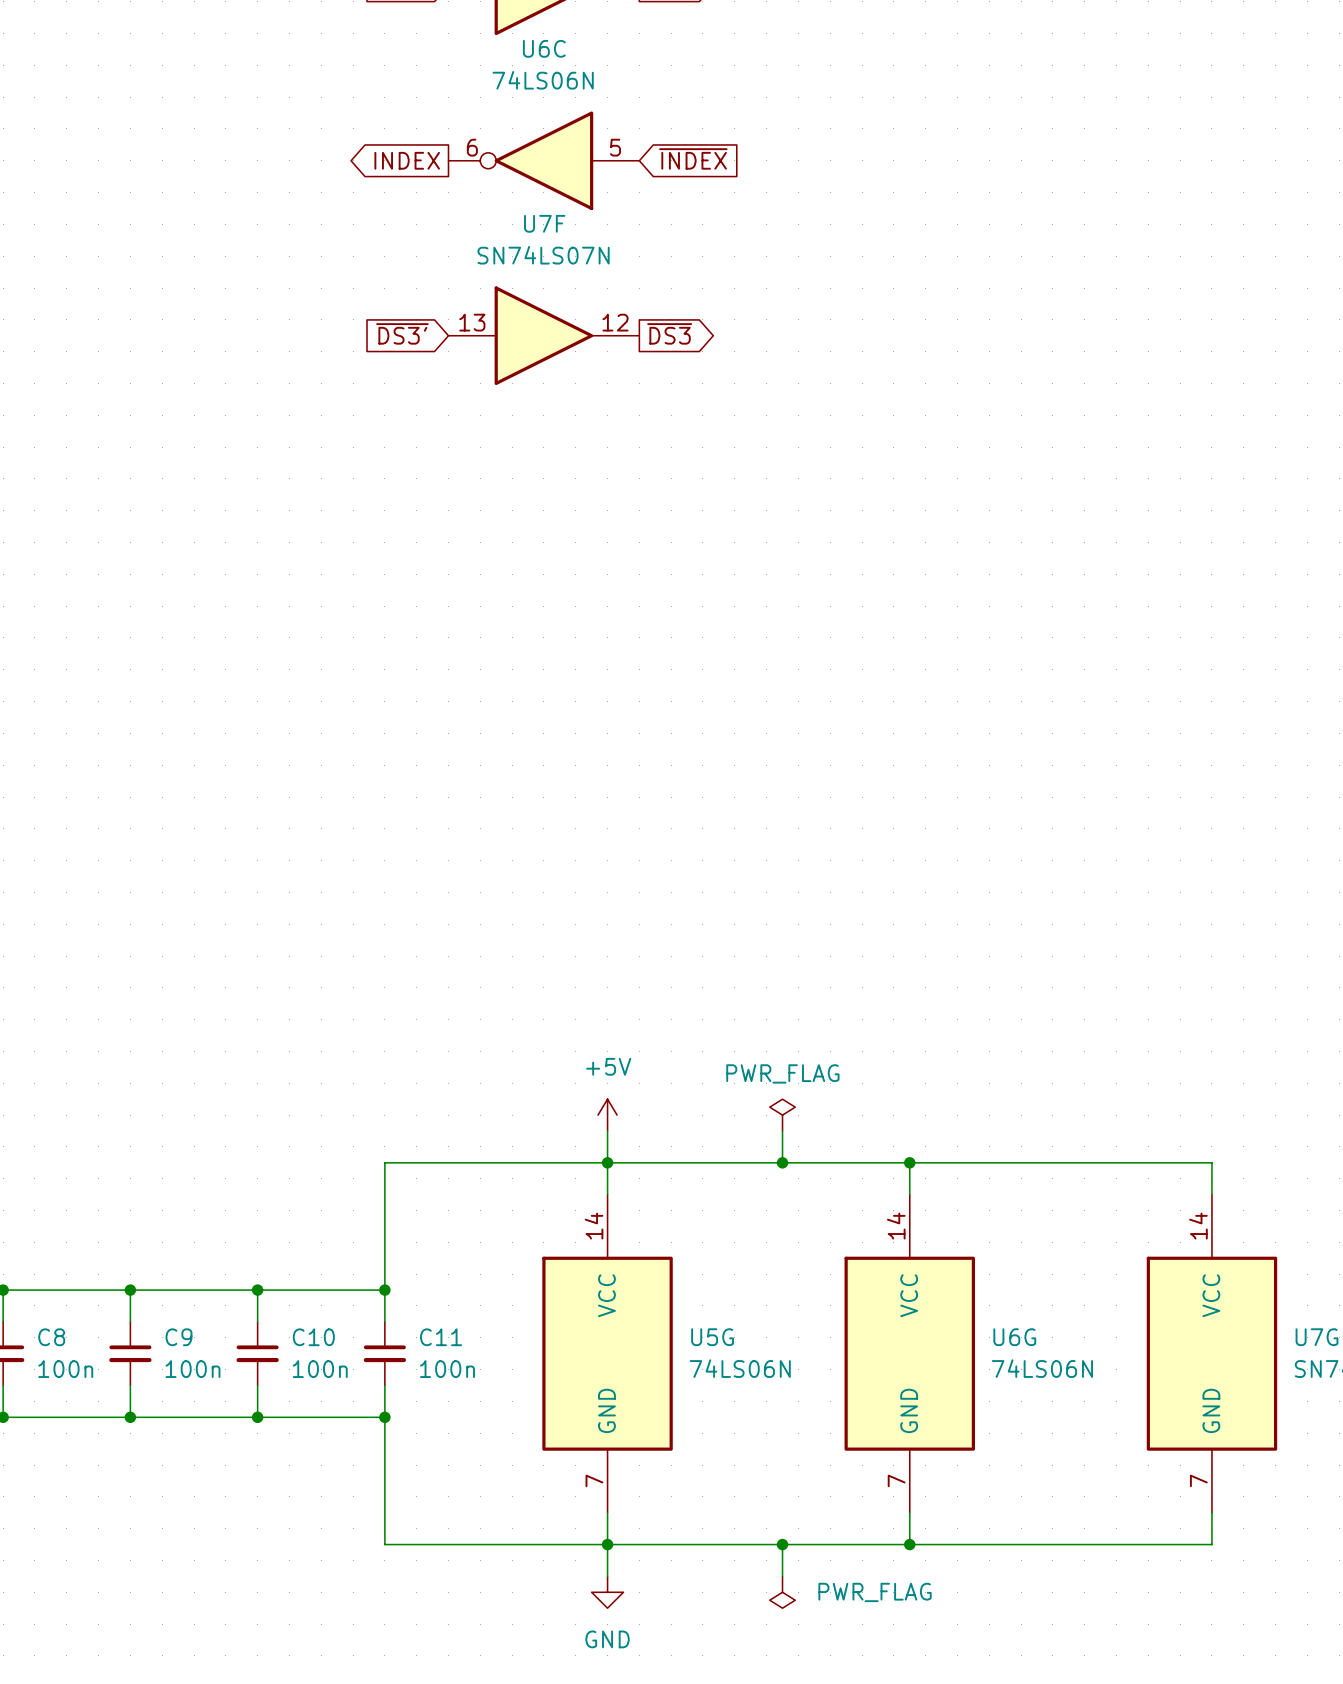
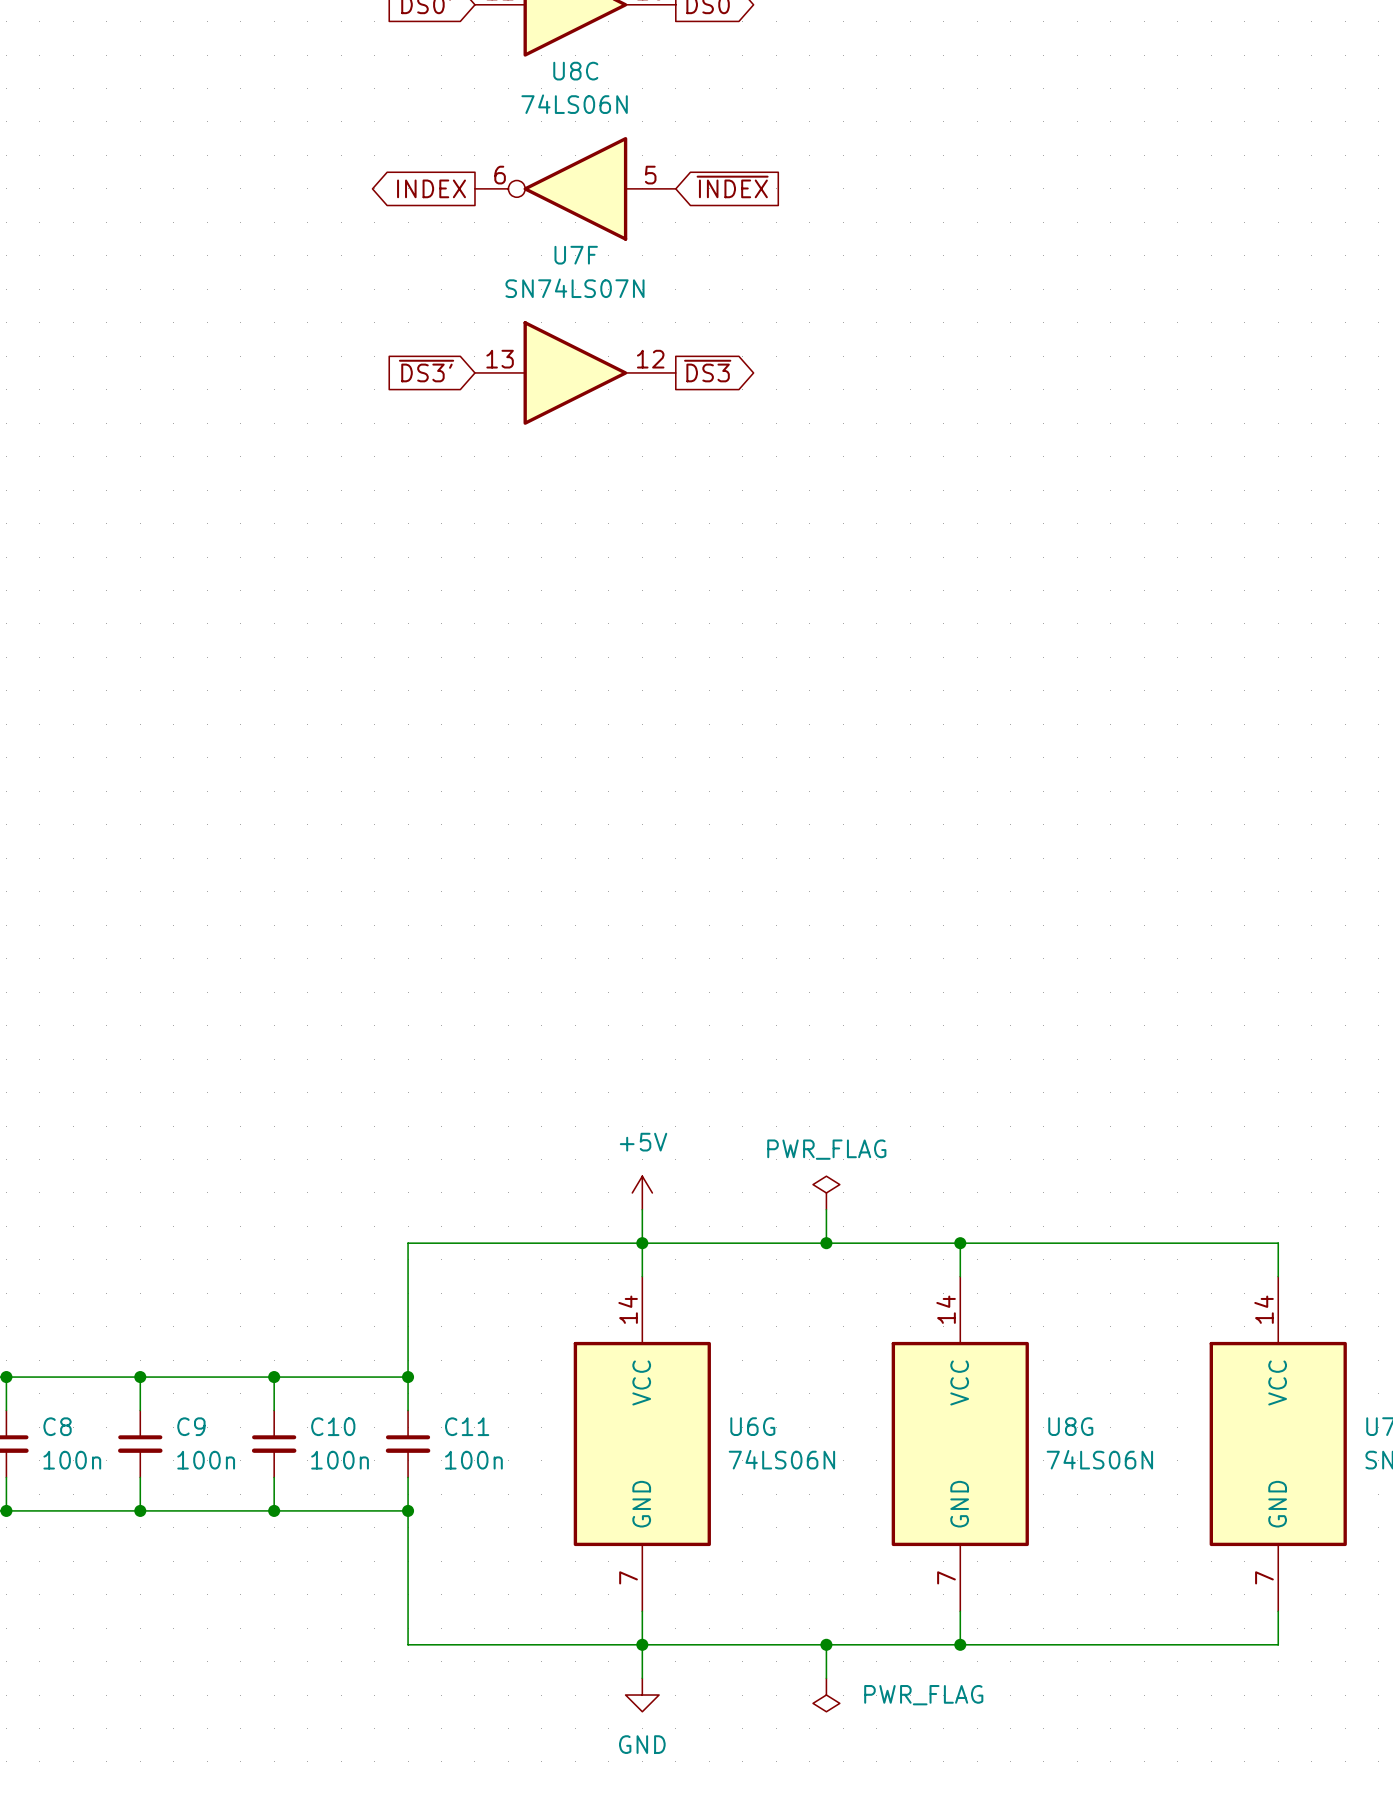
U6C name: U6C (544, 48) -> U8C (575, 71)
U5G name: U5G (712, 1337) -> U6G (752, 1426)
U6G name: U6G (1014, 1337) -> U8G (1070, 1426)

